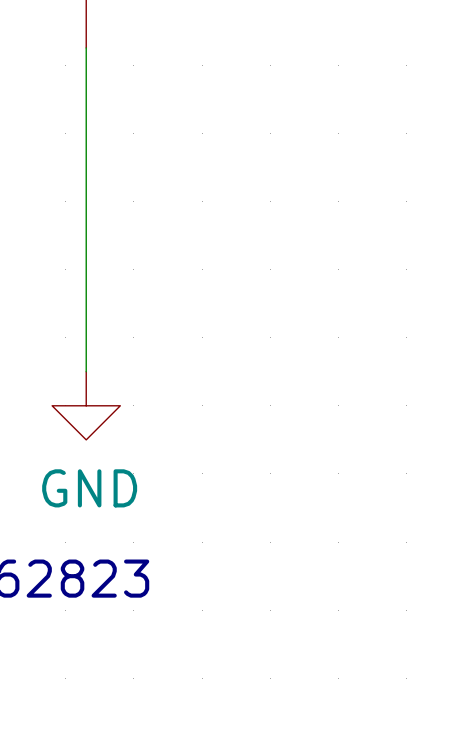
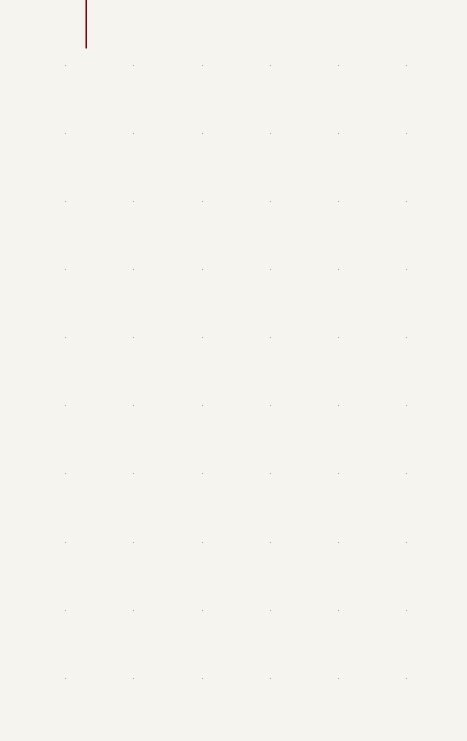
wire: (86, 47) (86, 371) -> none
power symbol: GND (86, 405) -> none

